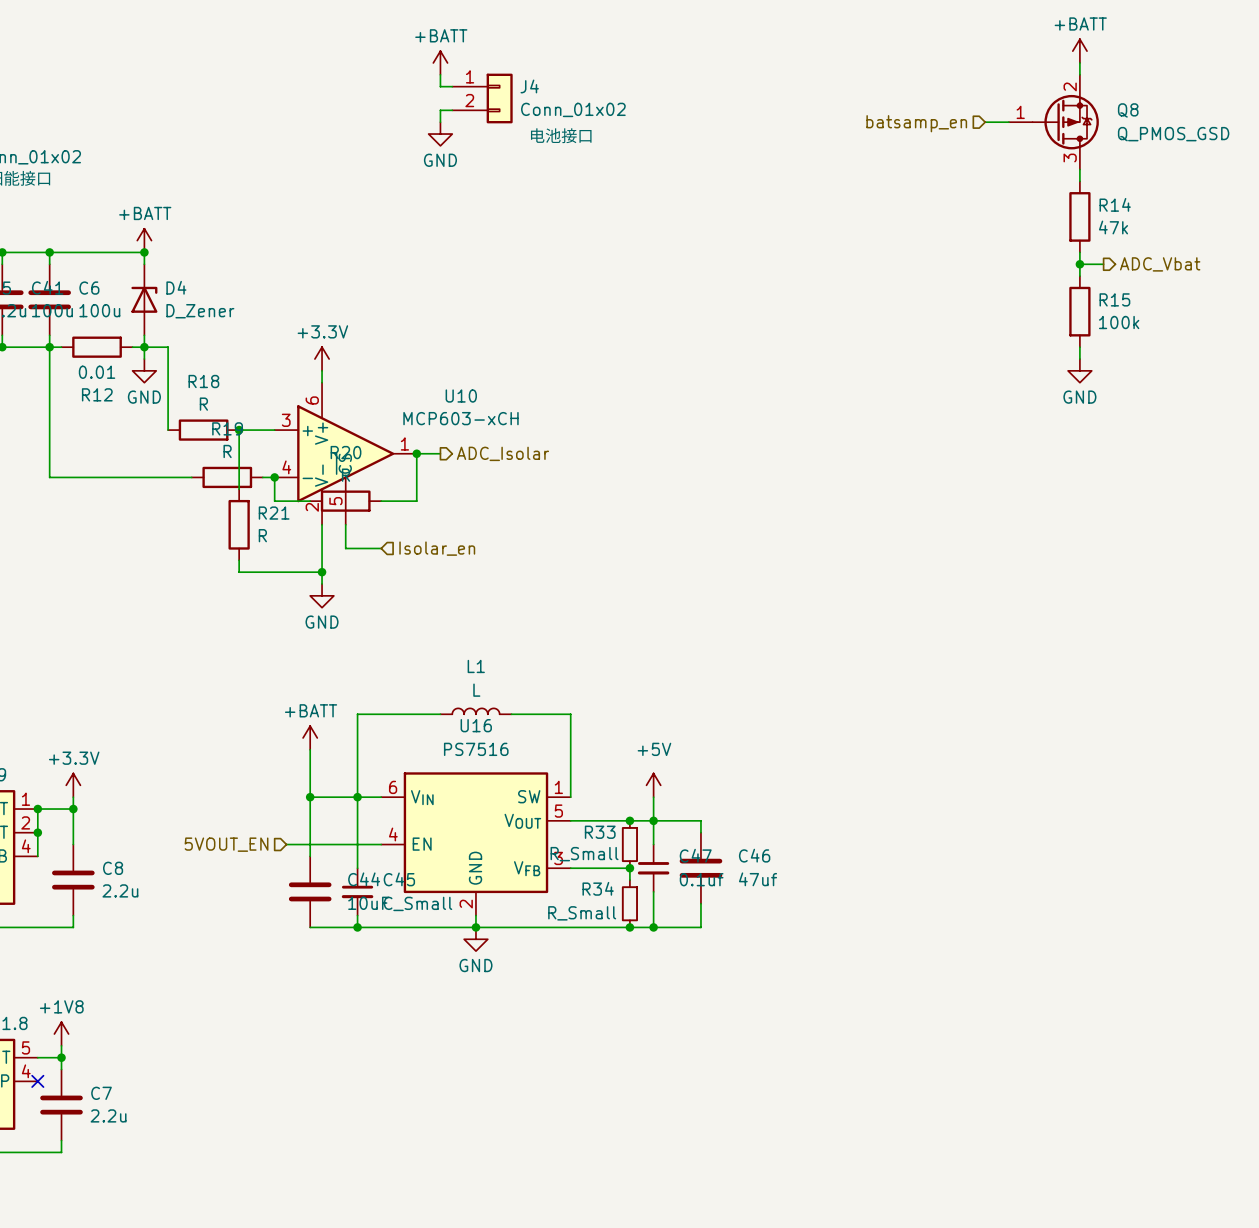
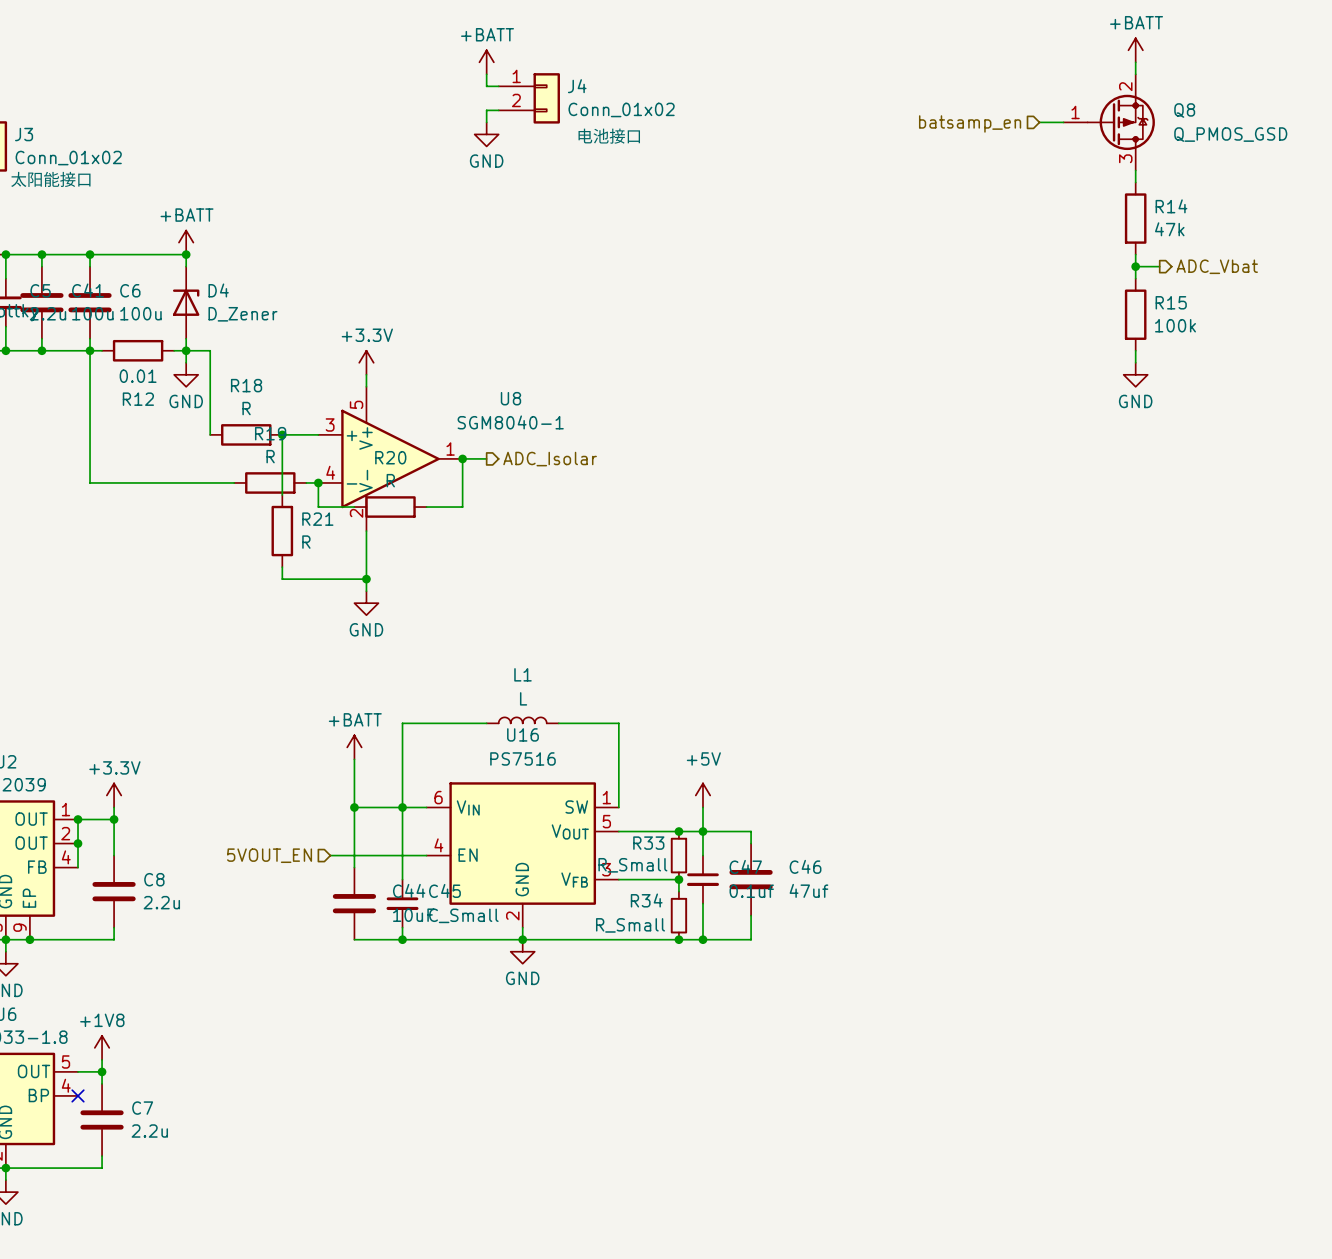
U10: MCP603-xCH (345, 453) -> none
U8: none -> SGM8040-1 (390, 458)
wire: (345, 524) (345, 548) (381, 548) -> none
hierarchical label: Isolar_en (437, 548) -> none

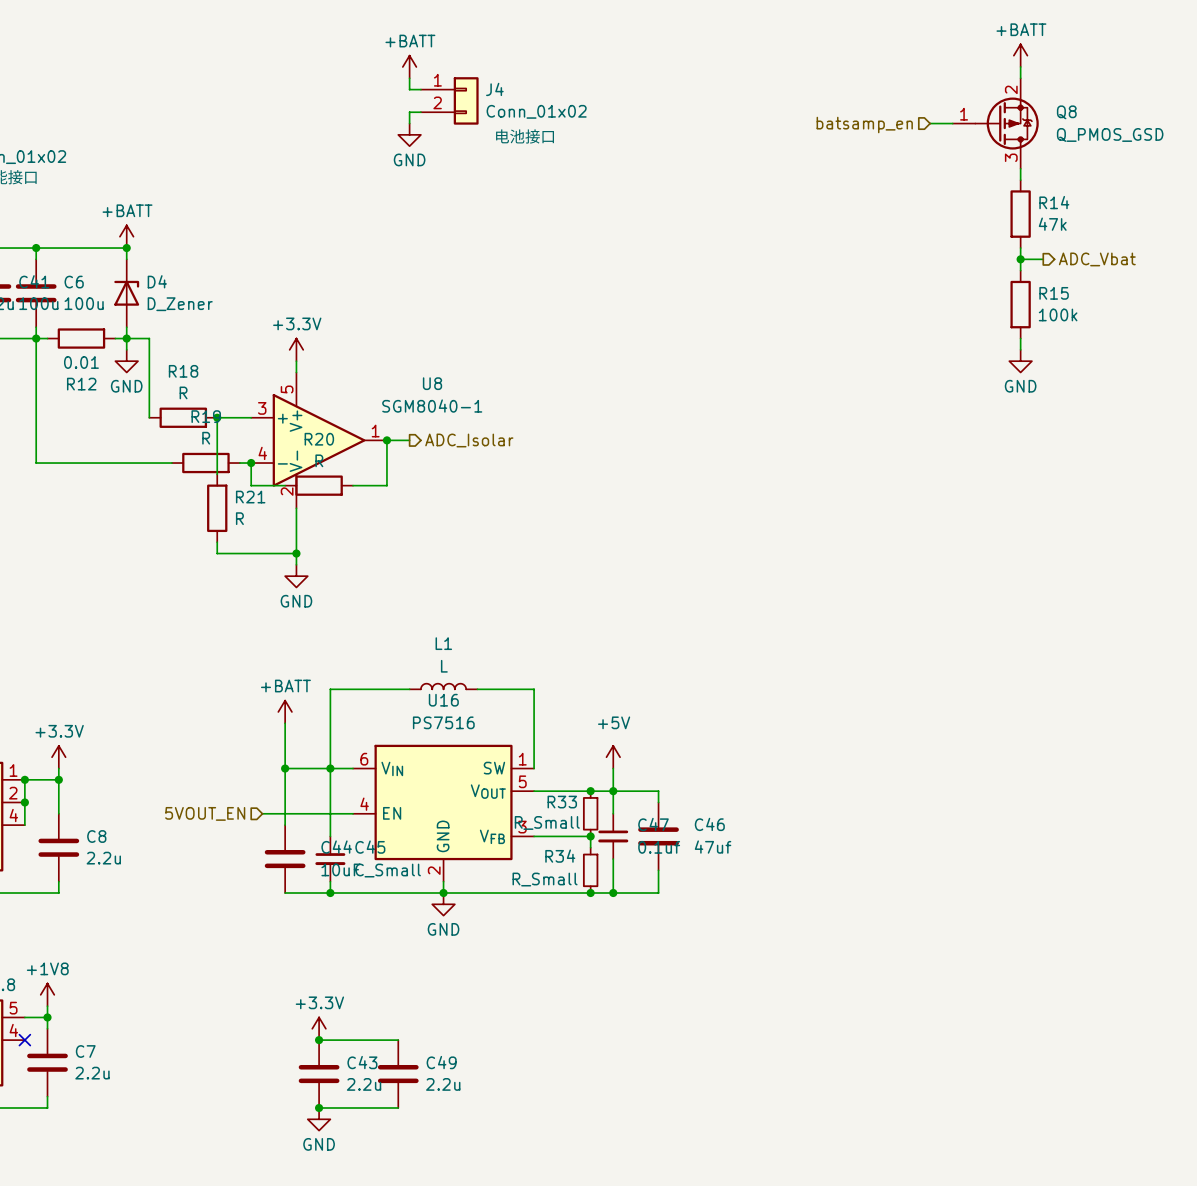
power symbol: none -> +3.3V (319, 1028)
wire: none -> (319, 1040) (398, 1040)
junction: none -> (319, 1040)
C43: none -> 2.2u (319, 1074)
C49: none -> 2.2u (398, 1074)
wire: none -> (319, 1107) (398, 1107)
junction: none -> (319, 1107)
power symbol: none -> GND (319, 1119)

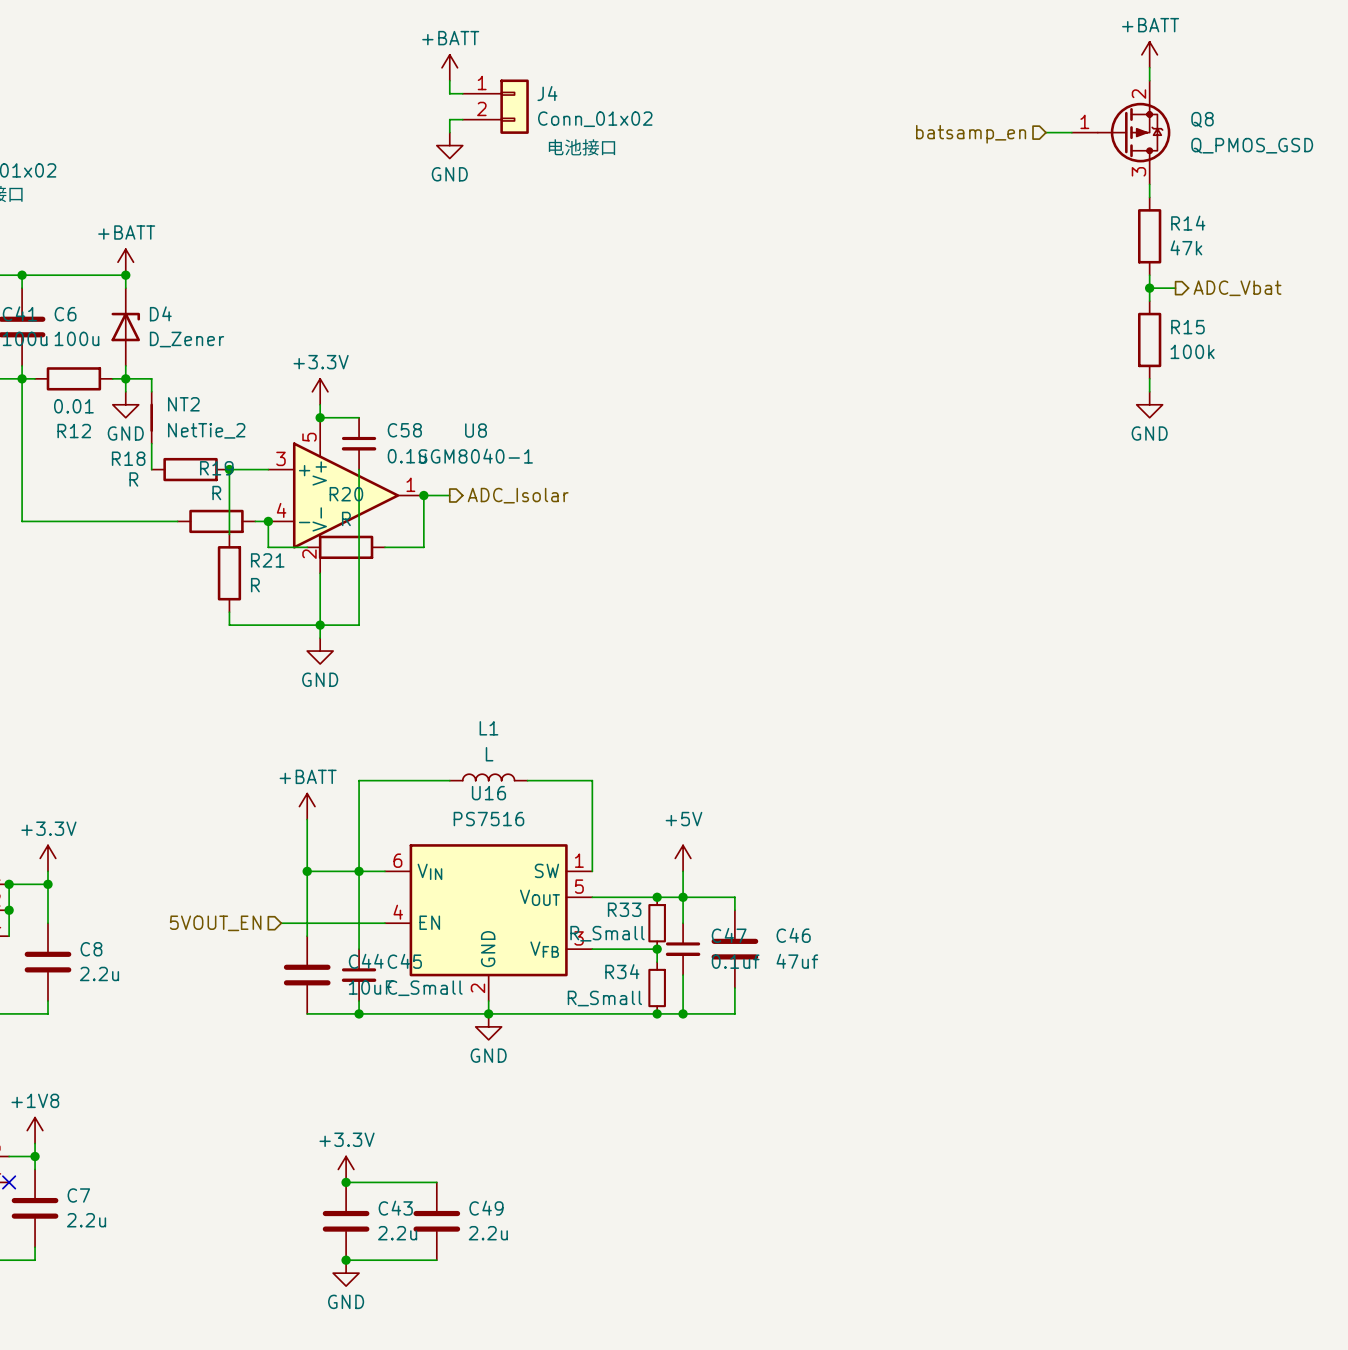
R18 name position: R18 (183, 371) -> R18 (128, 458)
NT2: none -> NetTie_2 (151, 417)
wire: none -> (320, 417) (359, 417)
junction: none -> (320, 417)
R18 value position: R (183, 392) -> R (133, 479)
C58: none -> 0.1u (359, 443)
wire: none -> (359, 469) (359, 625) (320, 625)

